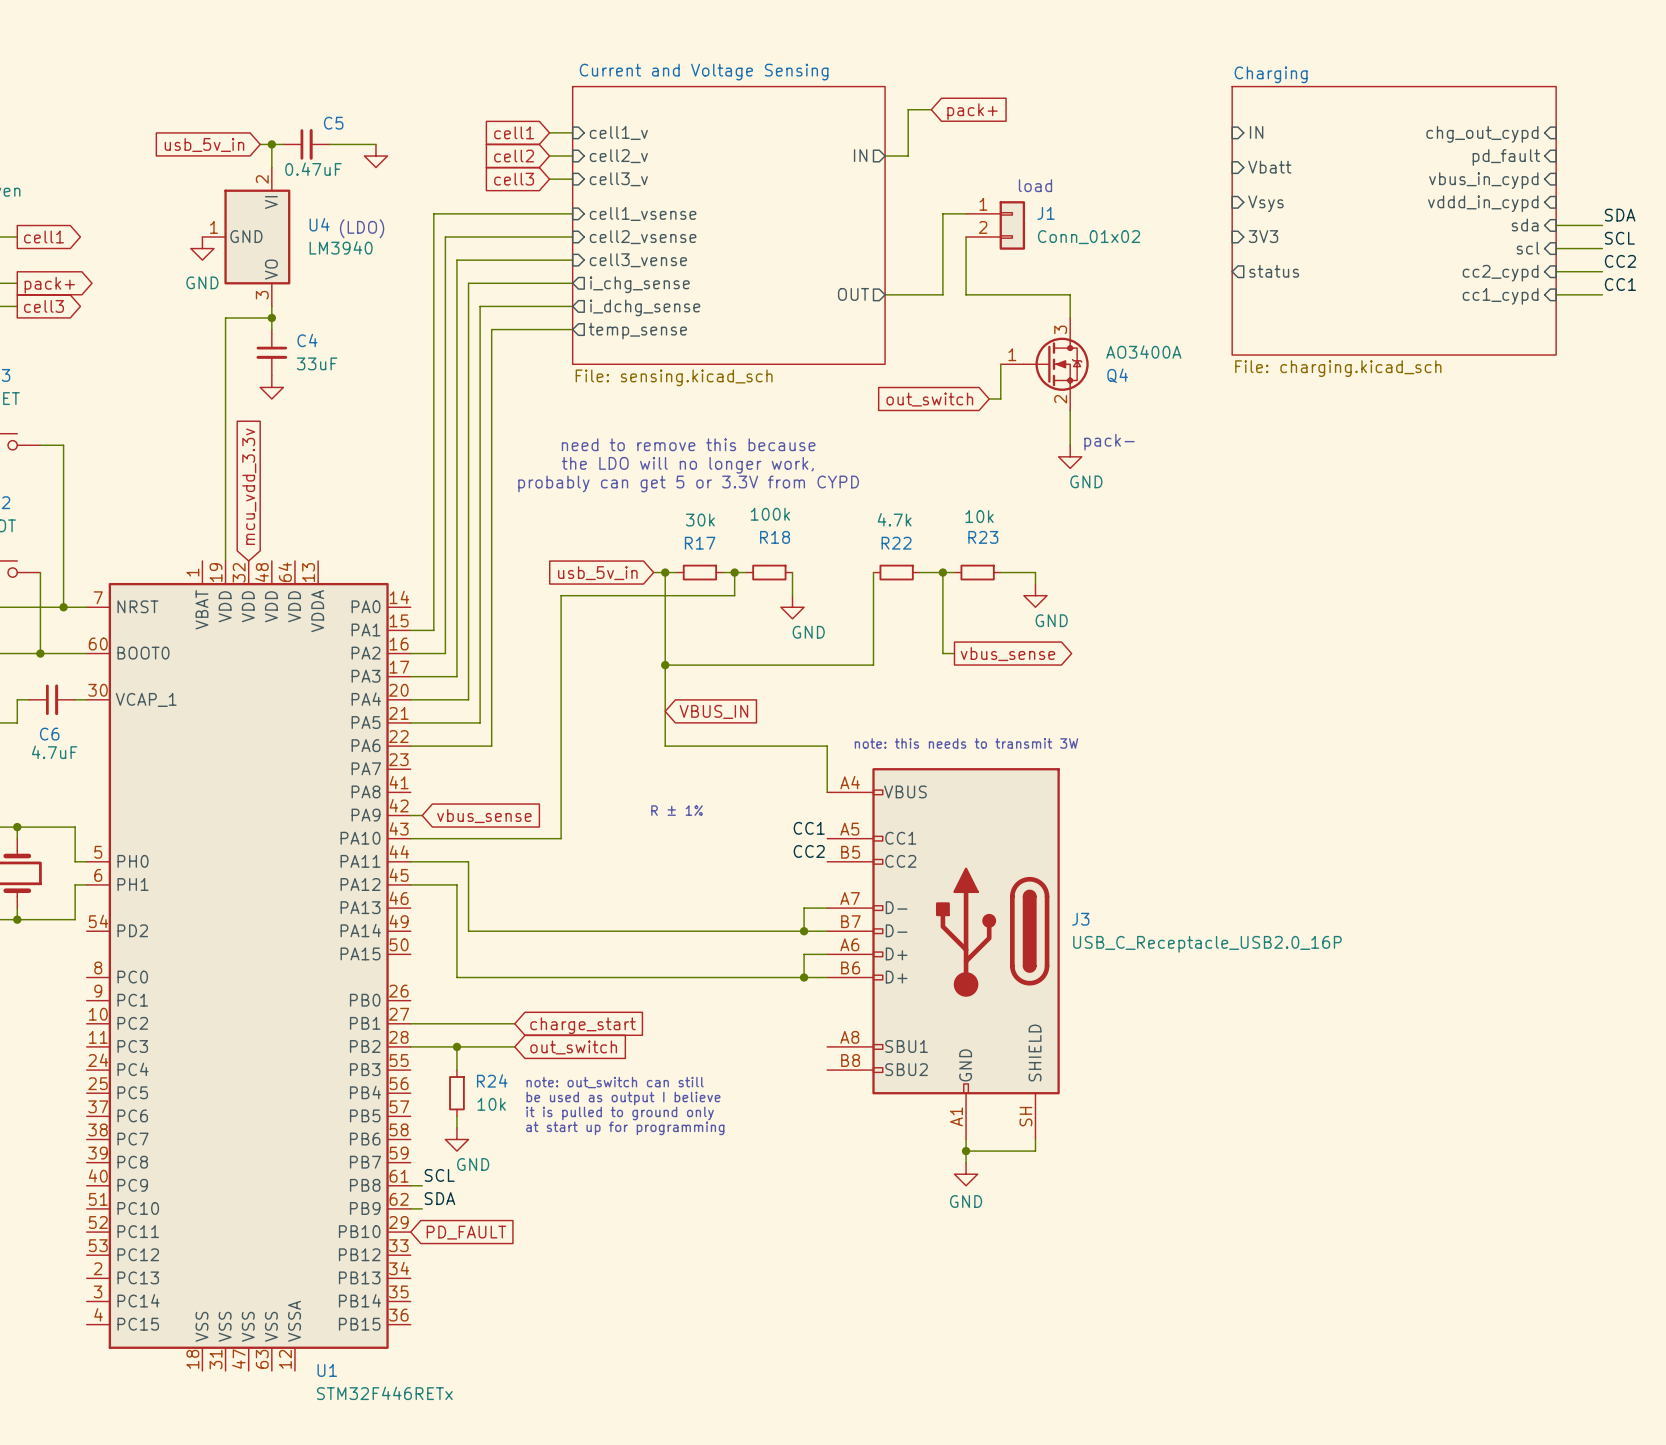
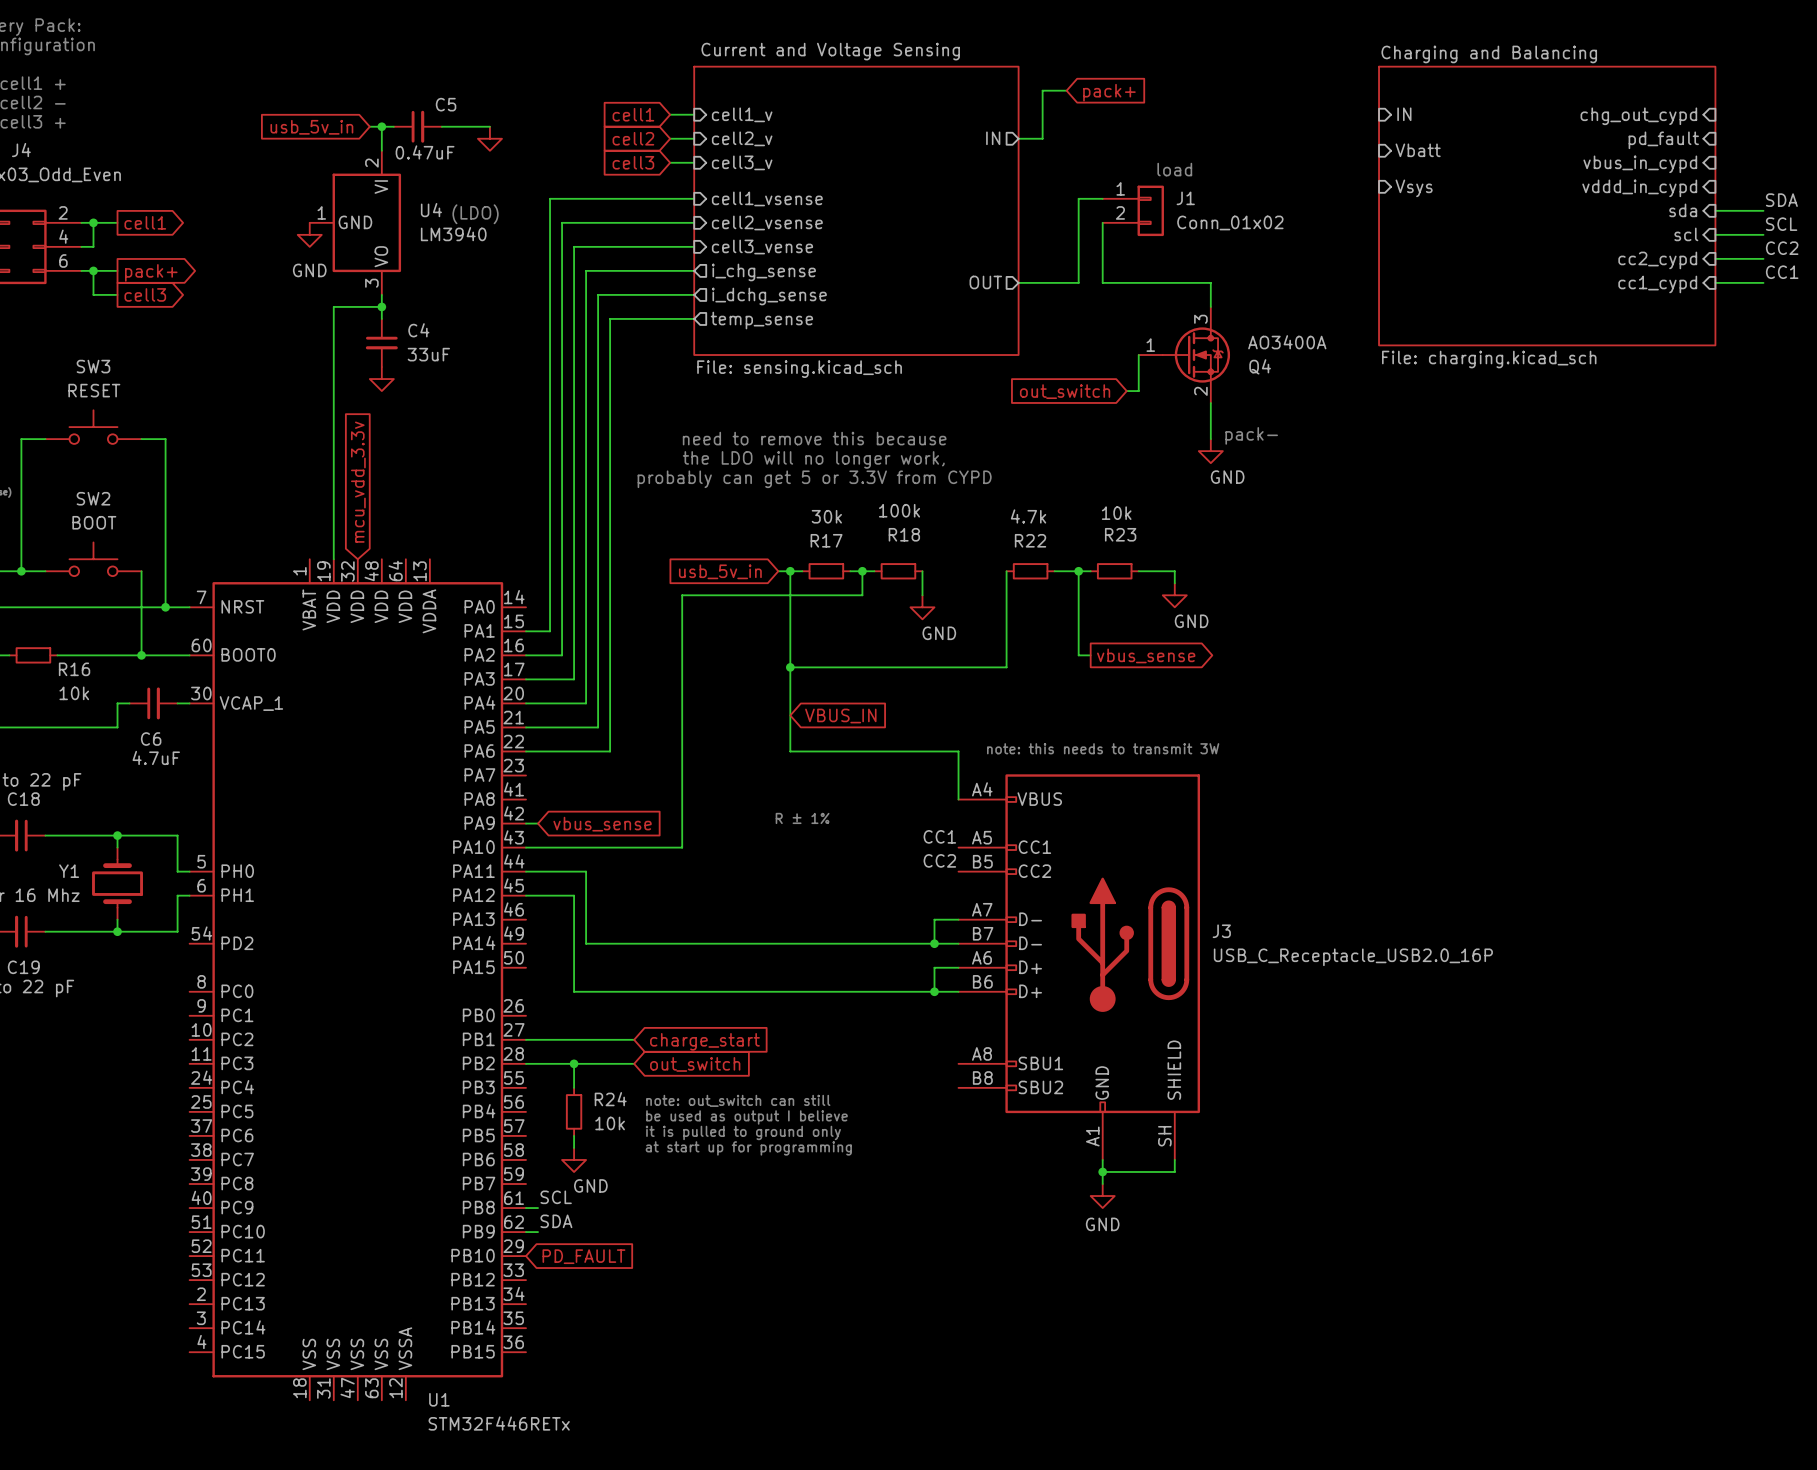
sheet Charging name: Charging (1271, 74) -> Charging and Balancing (1489, 54)
sheet pin: 3V3 (1263, 236) -> none
sheet pin: status (1274, 271) -> none

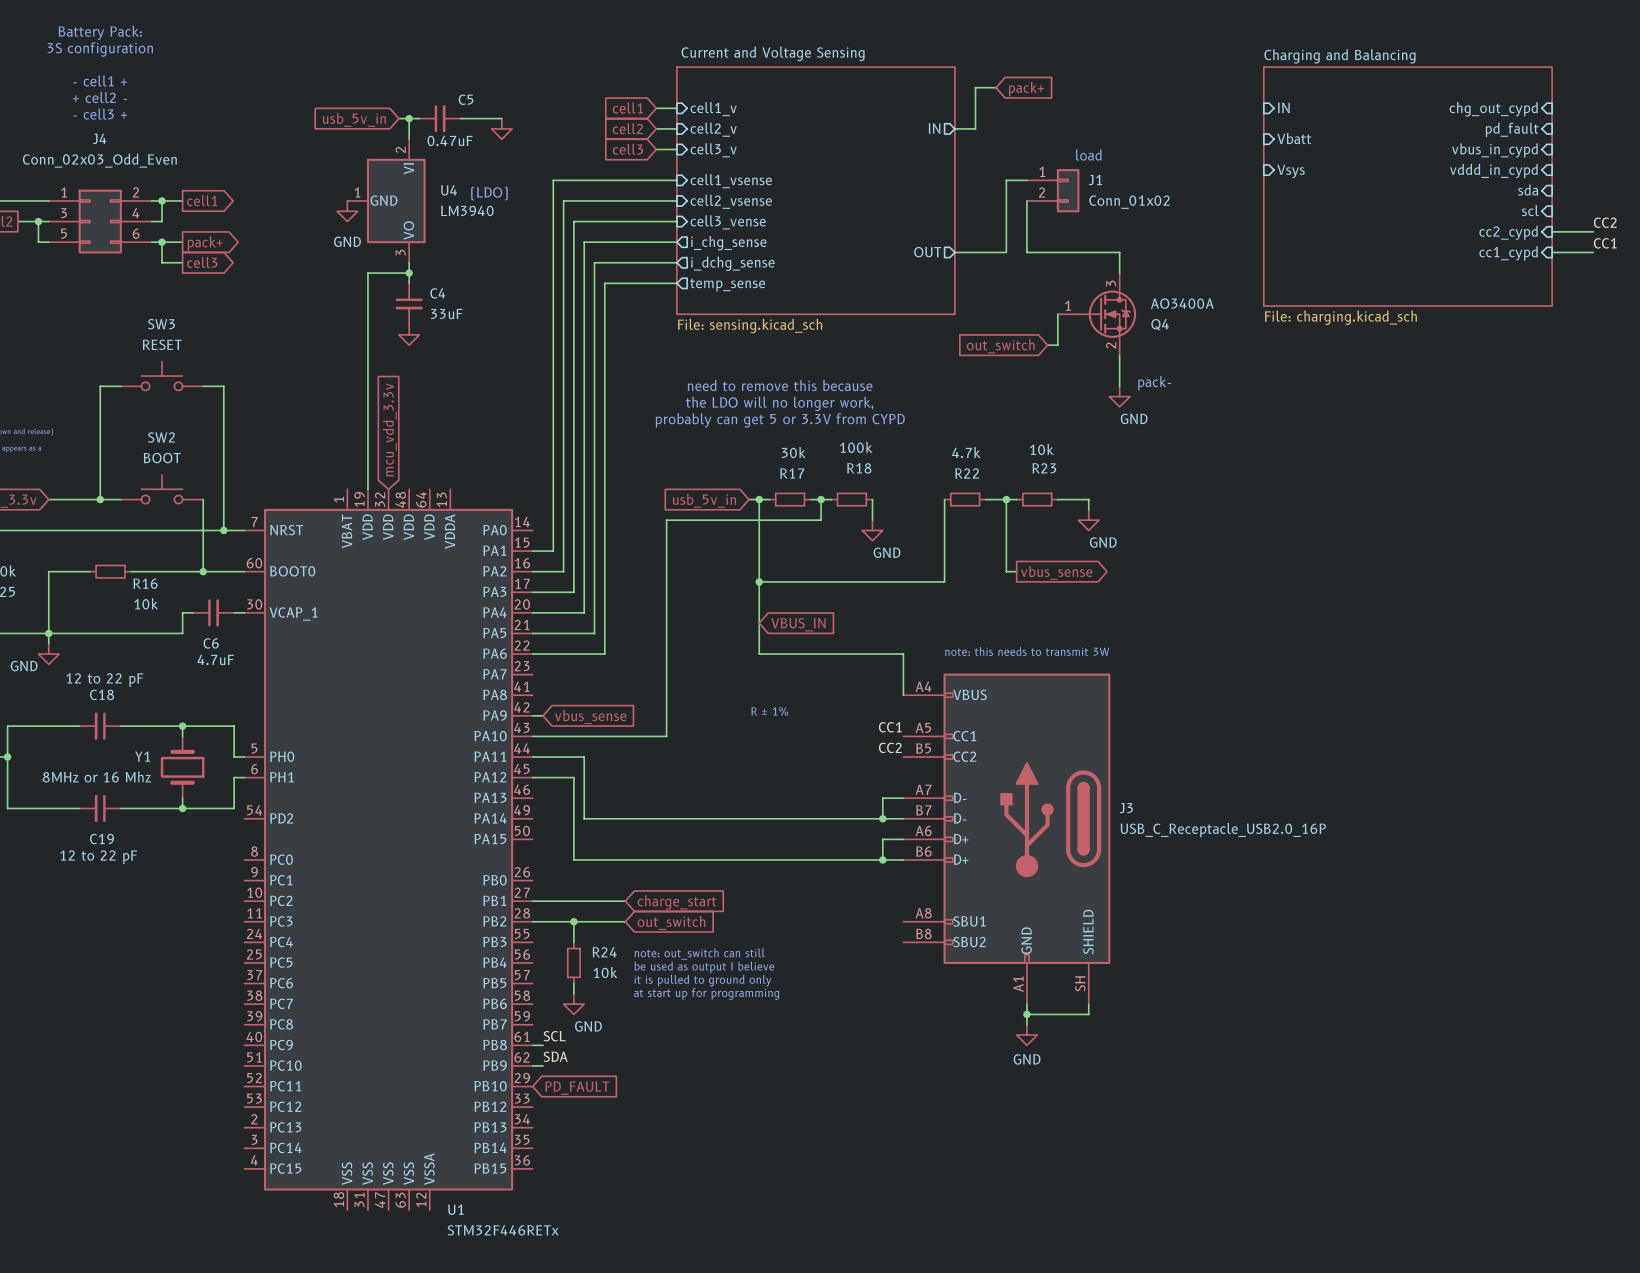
label: SDA (1781, 200) -> none
wire: (1715, 210) (1763, 210) -> none
label: SCL (1781, 224) -> none
wire: (1715, 234) (1763, 234) -> none

